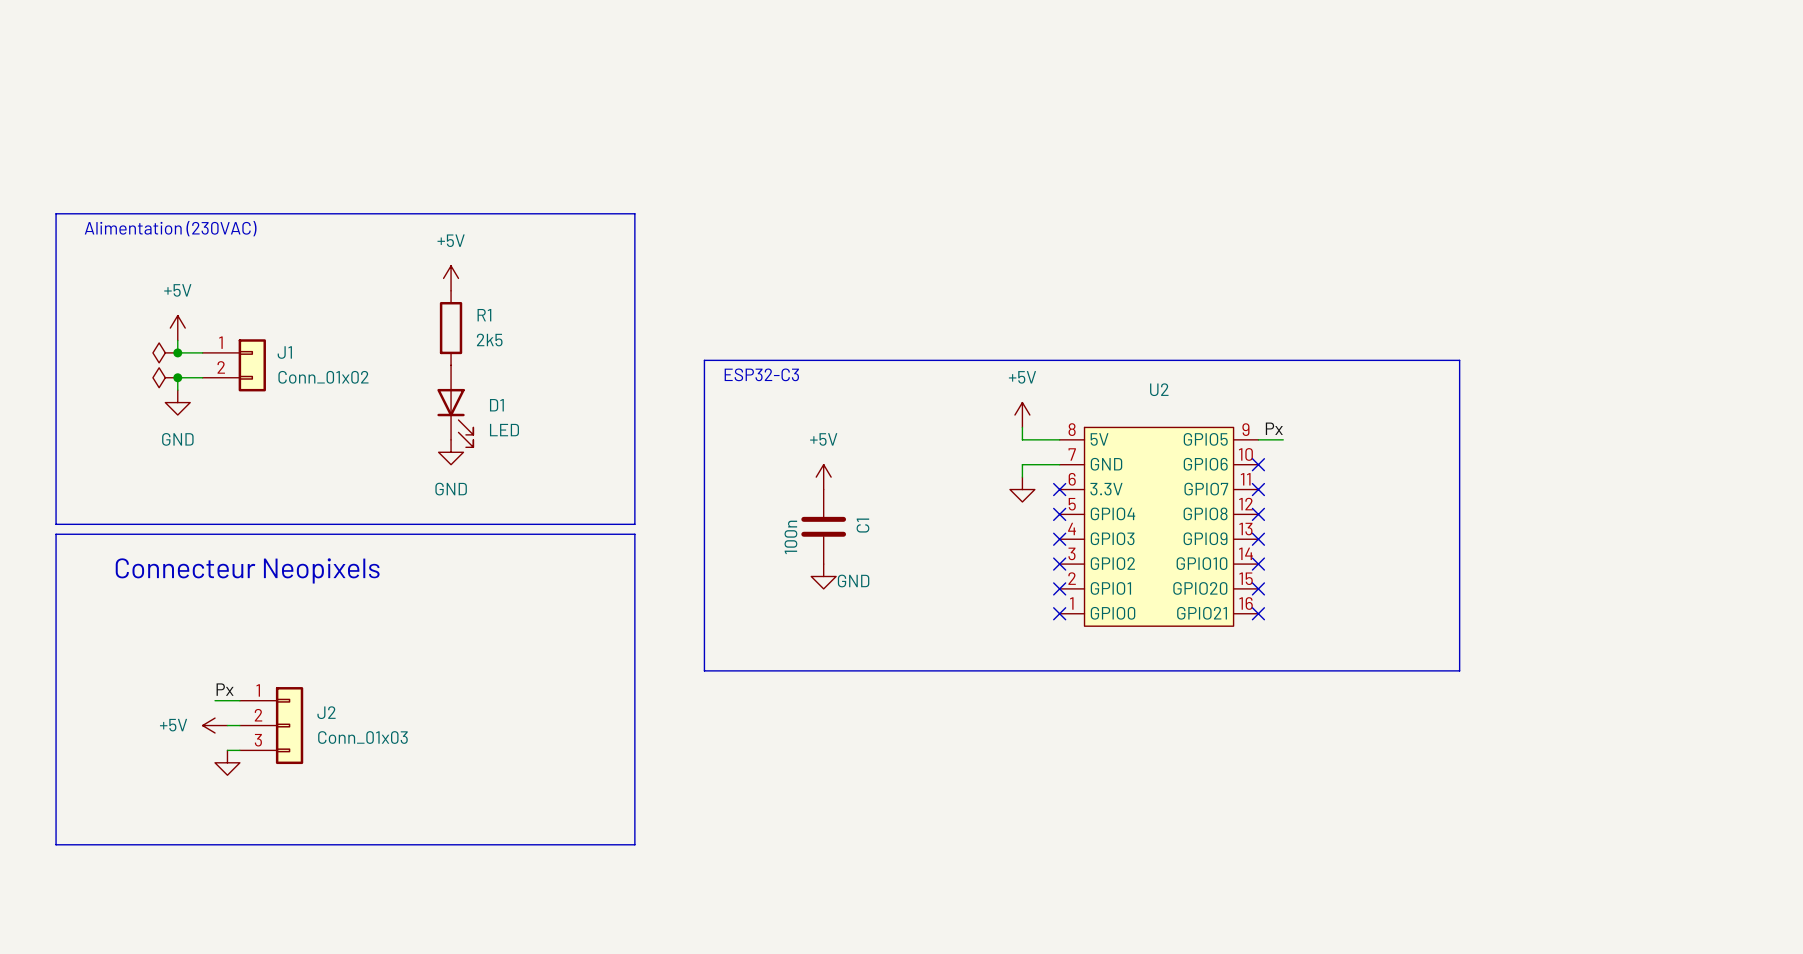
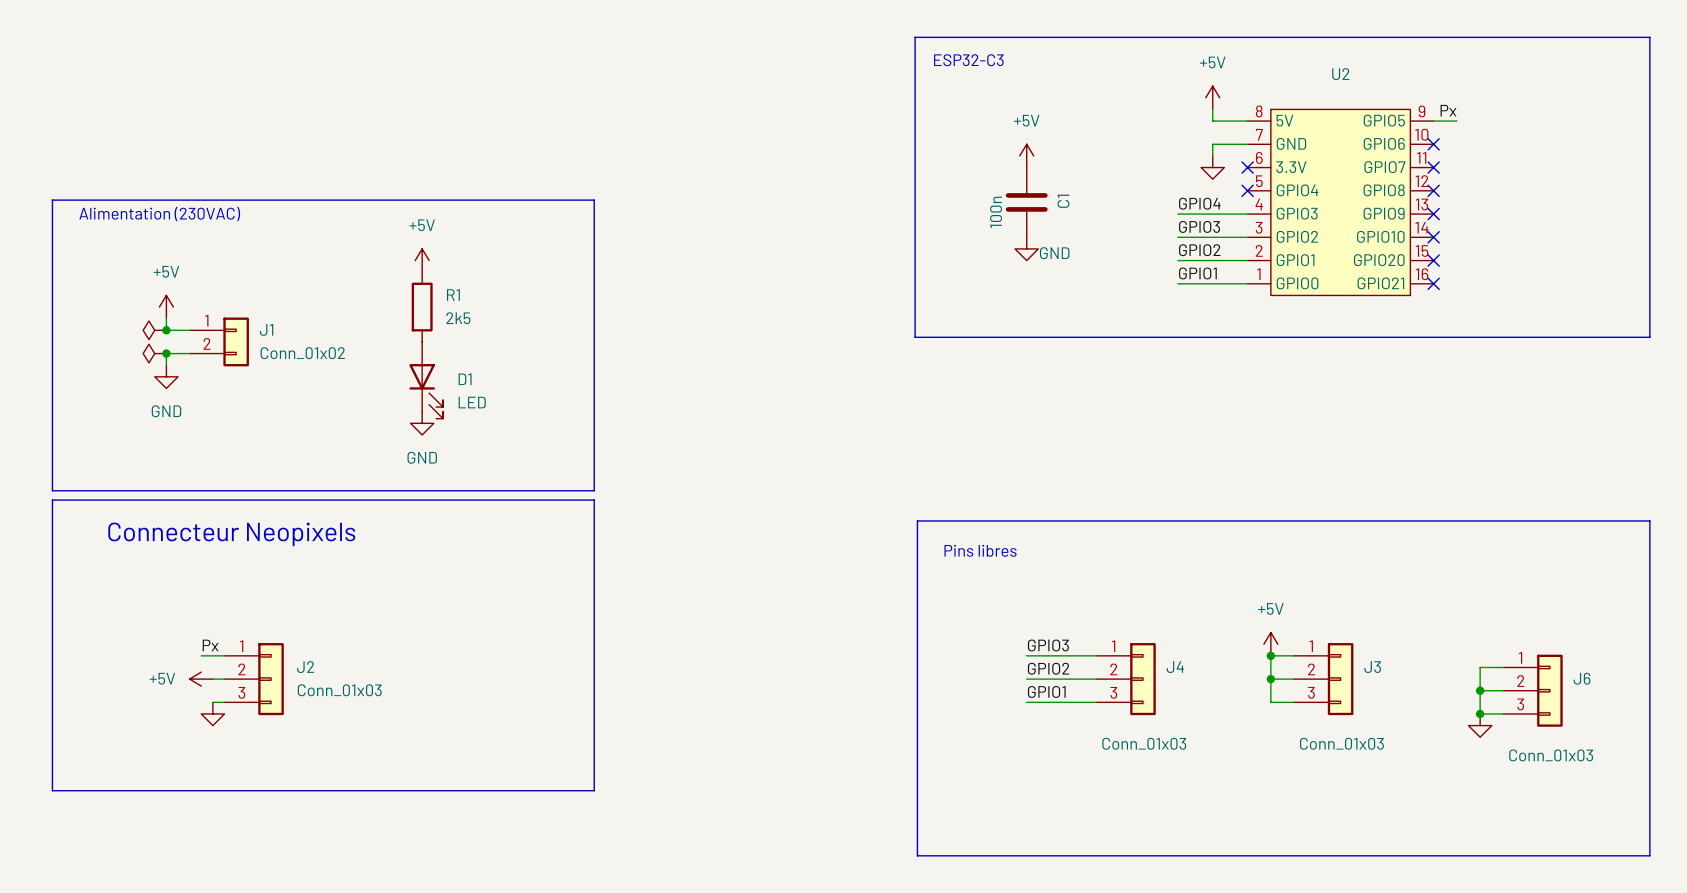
text: none -> ESP32-C3 (968, 60)
power symbol: none -> +5V (1212, 97)
wire: none -> (1212, 109) (1212, 121) (1247, 121)
label: none -> Px (1448, 110)
wire: none -> (1433, 121) (1456, 121)
wire: none -> (1247, 144) (1212, 144) (1212, 155)
no-connect mark: none -> (1433, 144)
power symbol: none -> +5V (1026, 155)
power symbol: none -> (1212, 167)
no-connect mark: none -> (1247, 167)
no-connect mark: none -> (1433, 167)
no-connect mark: none -> (1247, 190)
no-connect mark: none -> (1433, 190)
label: none -> GPIO4 (1199, 203)
wire: none -> (1177, 214) (1247, 214)
no-connect mark: none -> (1433, 214)
label: none -> GPIO3 (1199, 226)
wire: none -> (1177, 237) (1247, 237)
no-connect mark: none -> (1433, 237)
power symbol: none -> GND (1026, 248)
label: none -> GPIO2 (1199, 250)
wire: none -> (1177, 260) (1247, 260)
no-connect mark: none -> (1433, 260)
label: none -> GPIO1 (1197, 273)
wire: none -> (1177, 283) (1247, 283)
no-connect mark: none -> (1433, 283)
line: (977, 360) (704, 360) (704, 670) (1459, 670) (1459, 360) -> (915, 337) (915, 37) (1649, 37) (1649, 337) (1366, 337)
text: ESP32-C3 (761, 374) -> none
power symbol: +5V (1022, 415) -> none
wire: (1022, 427) (1022, 439) (1059, 439) -> none
label: Px (1274, 428) -> none
wire: (1258, 439) (1283, 439) -> none
wire: (1059, 464) (1022, 464) (1022, 477) -> none
no-connect mark: (1258, 464) -> none
power symbol: +5V (823, 477) -> none
power symbol: (1022, 489) -> none
no-connect mark: (1059, 489) -> none
no-connect mark: (1258, 489) -> none
no-connect mark: (1059, 514) -> none
no-connect mark: (1258, 514) -> none
C1 position: (823, 526) -> (1026, 202)
U2 position: (1159, 526) -> (1340, 202)
no-connect mark: (1059, 539) -> none
no-connect mark: (1258, 539) -> none
line: none -> (917, 520) (1649, 520) (1649, 855) (917, 855) (917, 520)
no-connect mark: (1059, 564) -> none
no-connect mark: (1258, 564) -> none
power symbol: GND (823, 576) -> none
text: none -> Pins libres (980, 550)
no-connect mark: (1059, 588) -> none
no-connect mark: (1258, 588) -> none
no-connect mark: (1059, 613) -> none
no-connect mark: (1258, 613) -> none
power symbol: none -> +5V (1270, 644)
label: none -> GPIO3 (1048, 645)
wire: none -> (1026, 655) (1096, 655)
junction: none -> (1270, 655)
wire: none -> (1294, 655) (1270, 655) (1270, 702) (1294, 702)
wire: none -> (1503, 667) (1480, 667) (1480, 713) (1503, 713)
label: none -> GPIO2 (1048, 668)
wire: none -> (1026, 679) (1096, 679)
J4: none -> Conn_01x03 (1126, 679)
wire: none -> (1270, 679) (1294, 679)
junction: none -> (1270, 679)
J3: none -> Conn_01x03 (1323, 679)
wire: none -> (1480, 690) (1503, 690)
junction: none -> (1480, 690)
J6: none -> Conn_01x03 (1533, 690)
label: none -> GPIO1 (1046, 691)
wire: none -> (1026, 702) (1096, 702)
junction: none -> (1480, 713)
power symbol: none -> (1480, 725)

